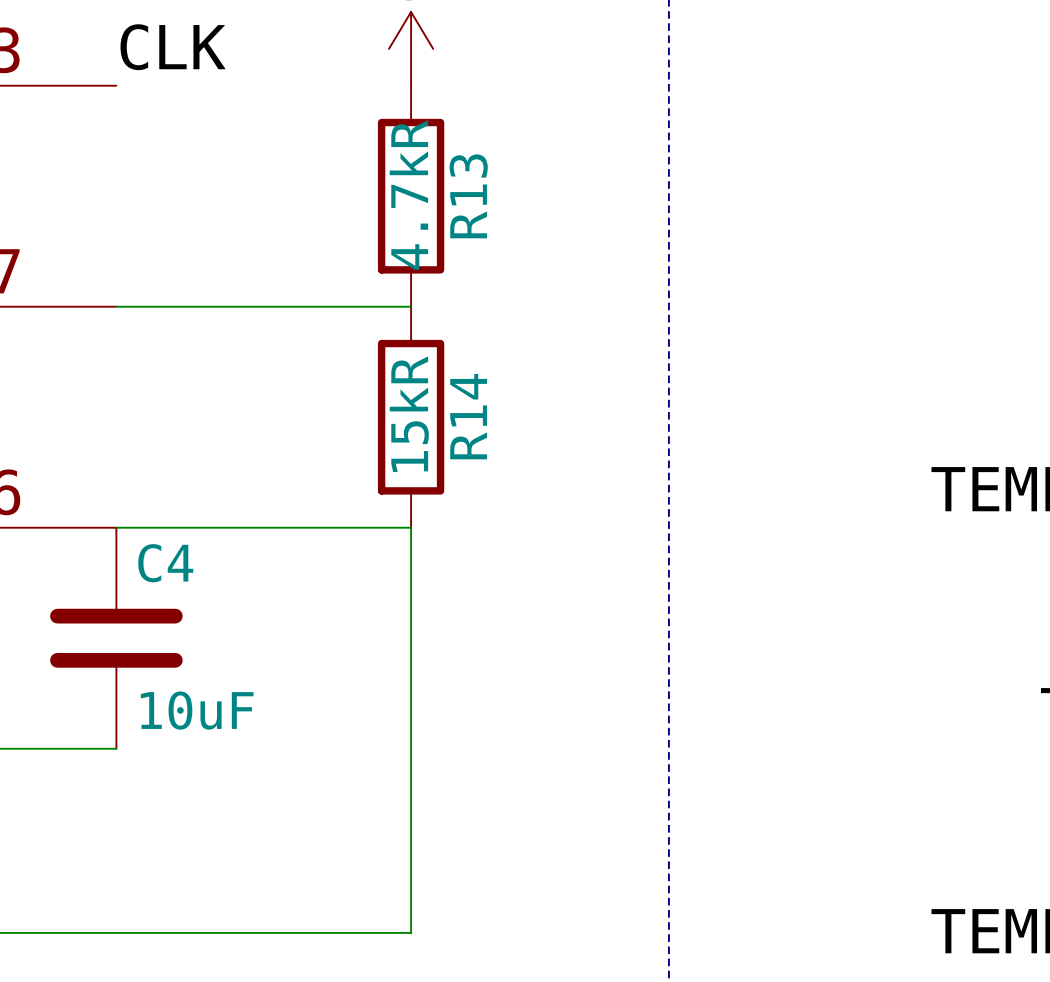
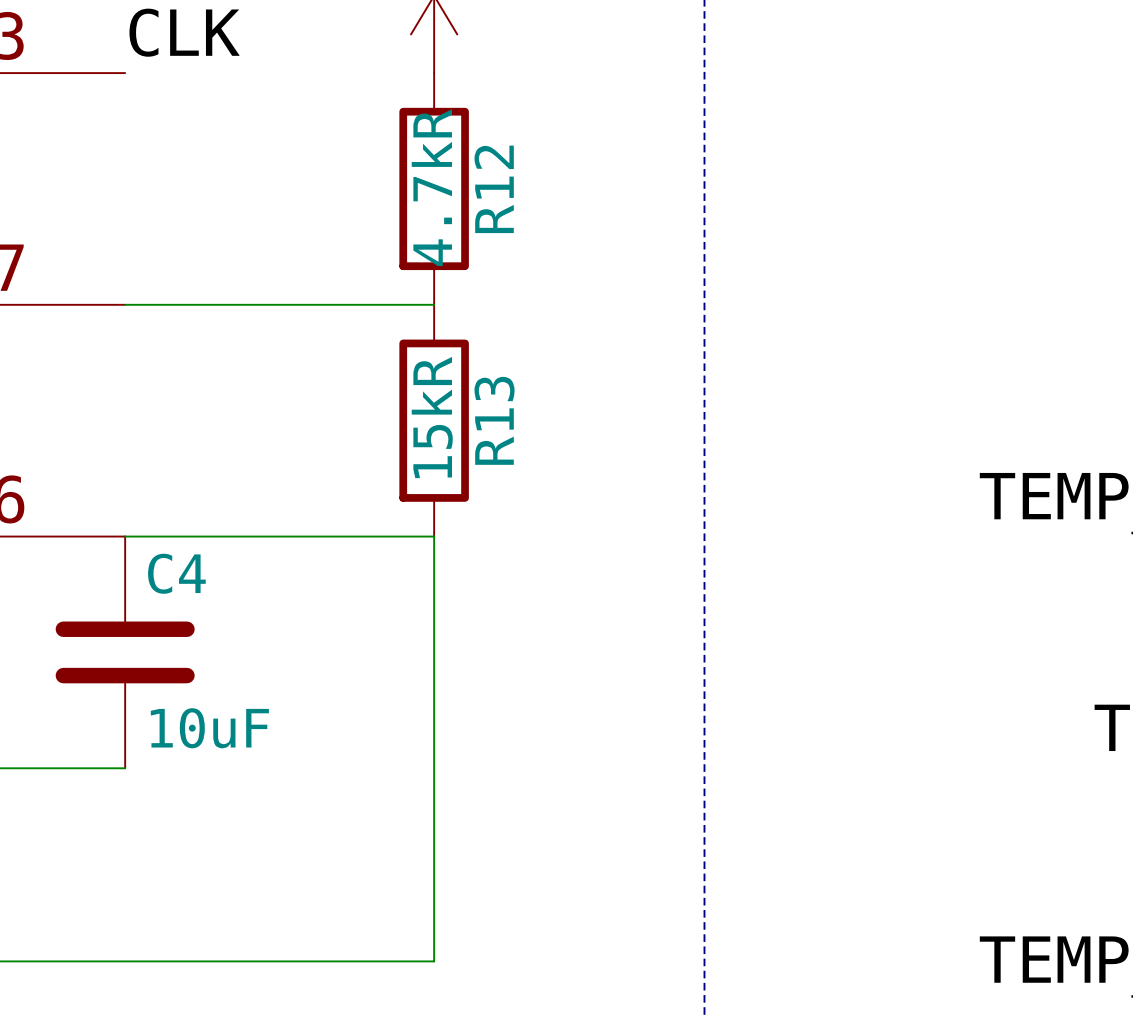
R13 name: R13 (468, 196) -> R12 (494, 189)
R14 name: R14 (468, 416) -> R13 (494, 420)

